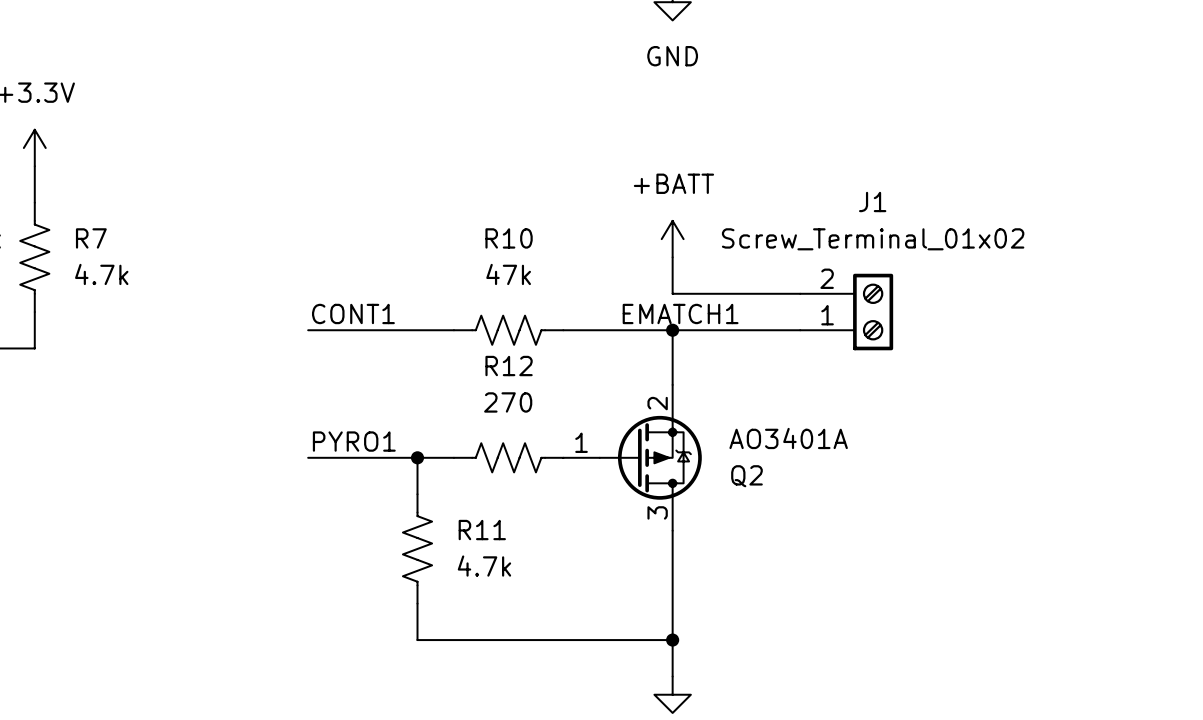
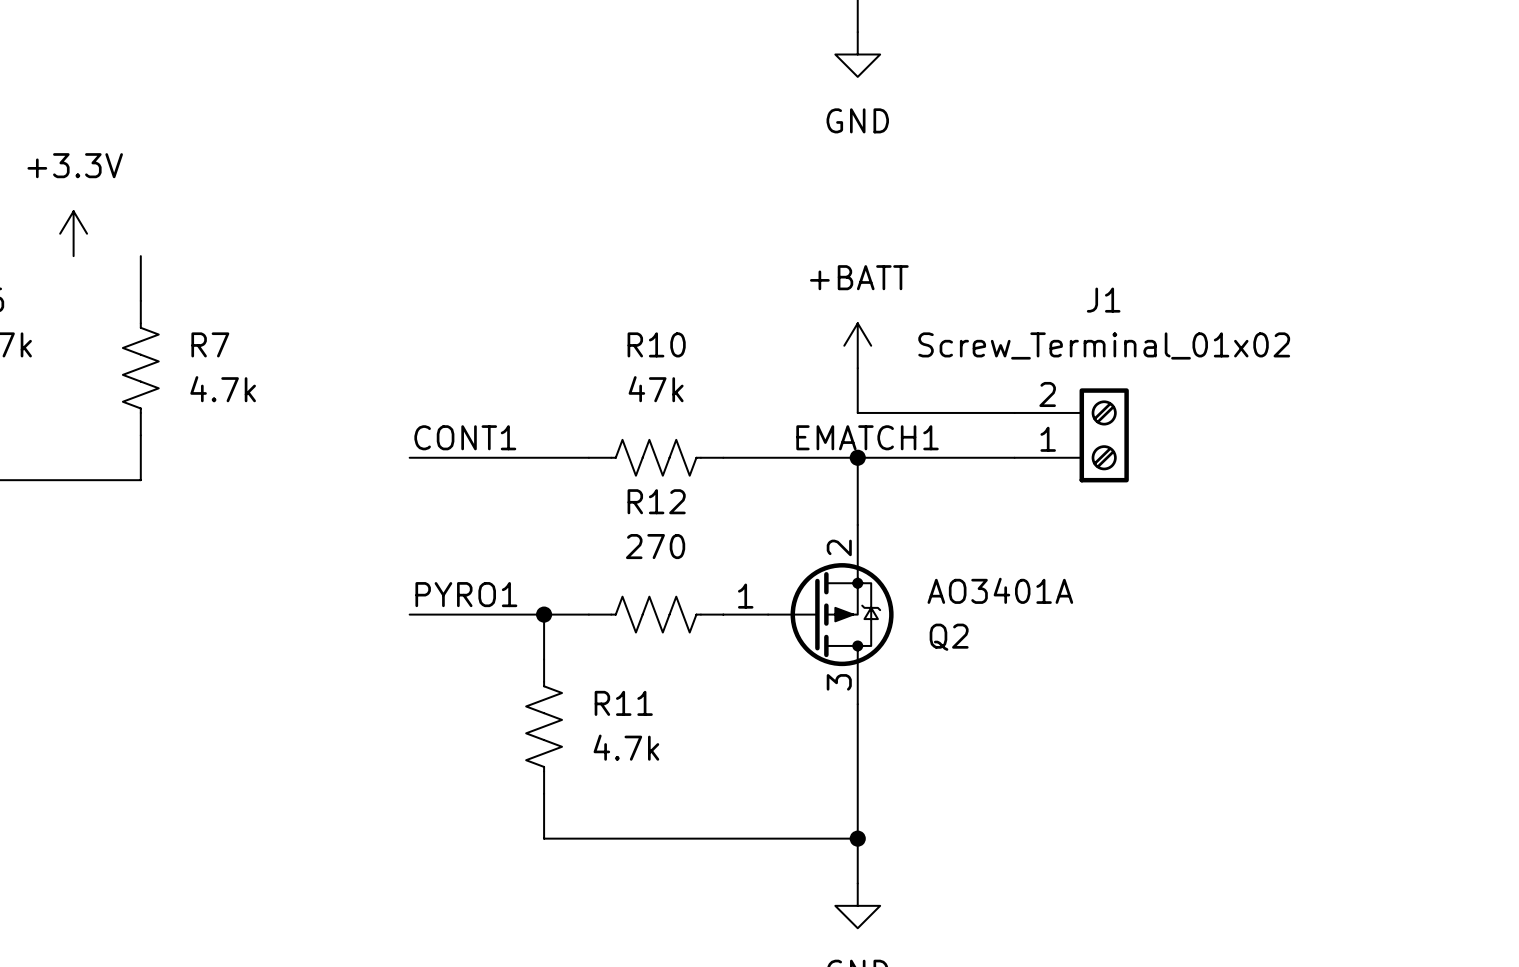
wire: (34, 166) (34, 202) -> (140, 256) (140, 300)
R7 position: (34, 257) -> (140, 368)
wire: (34, 312) (34, 348) -> (140, 435) (140, 480) (73, 480)

